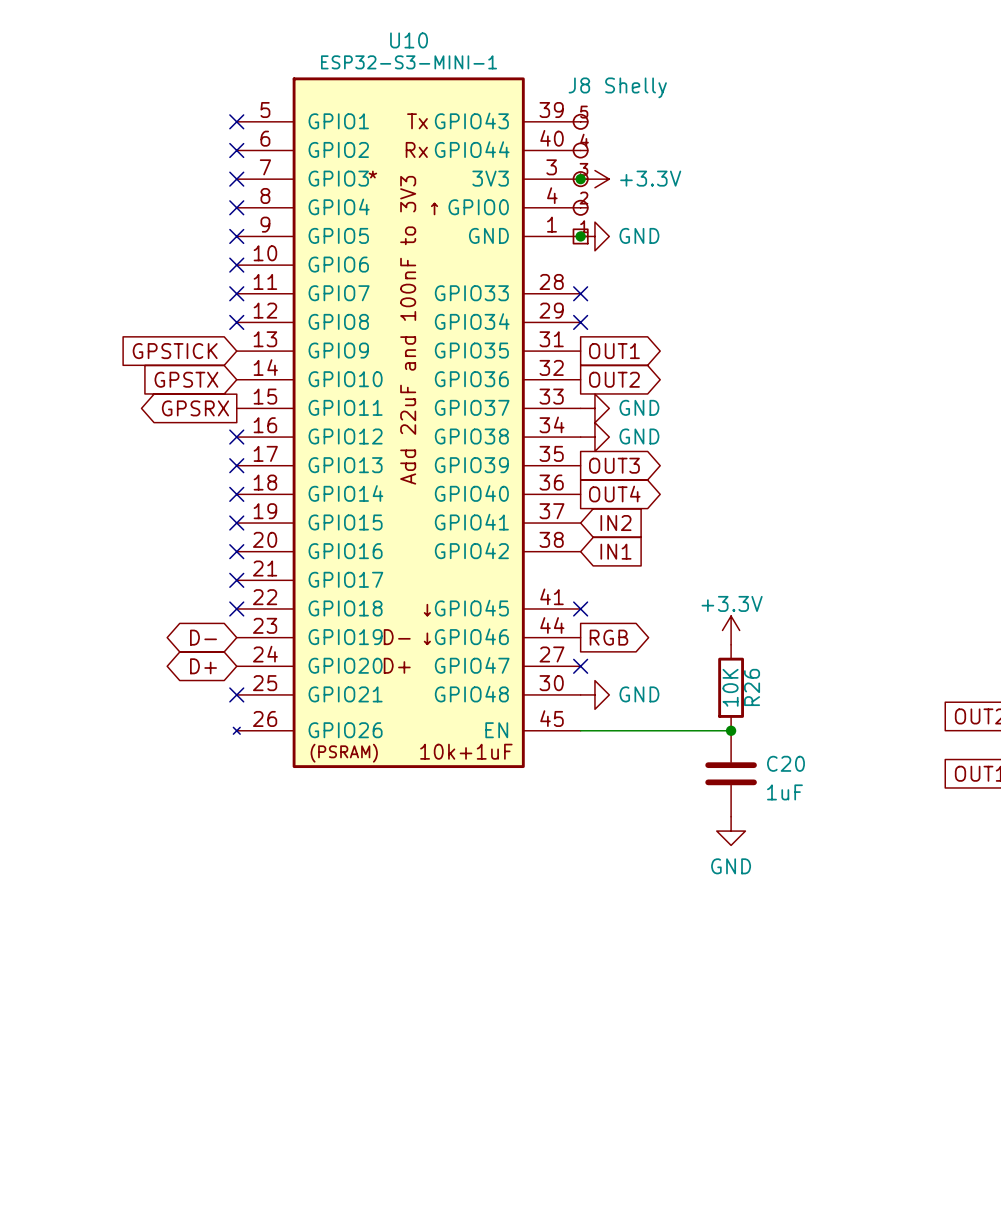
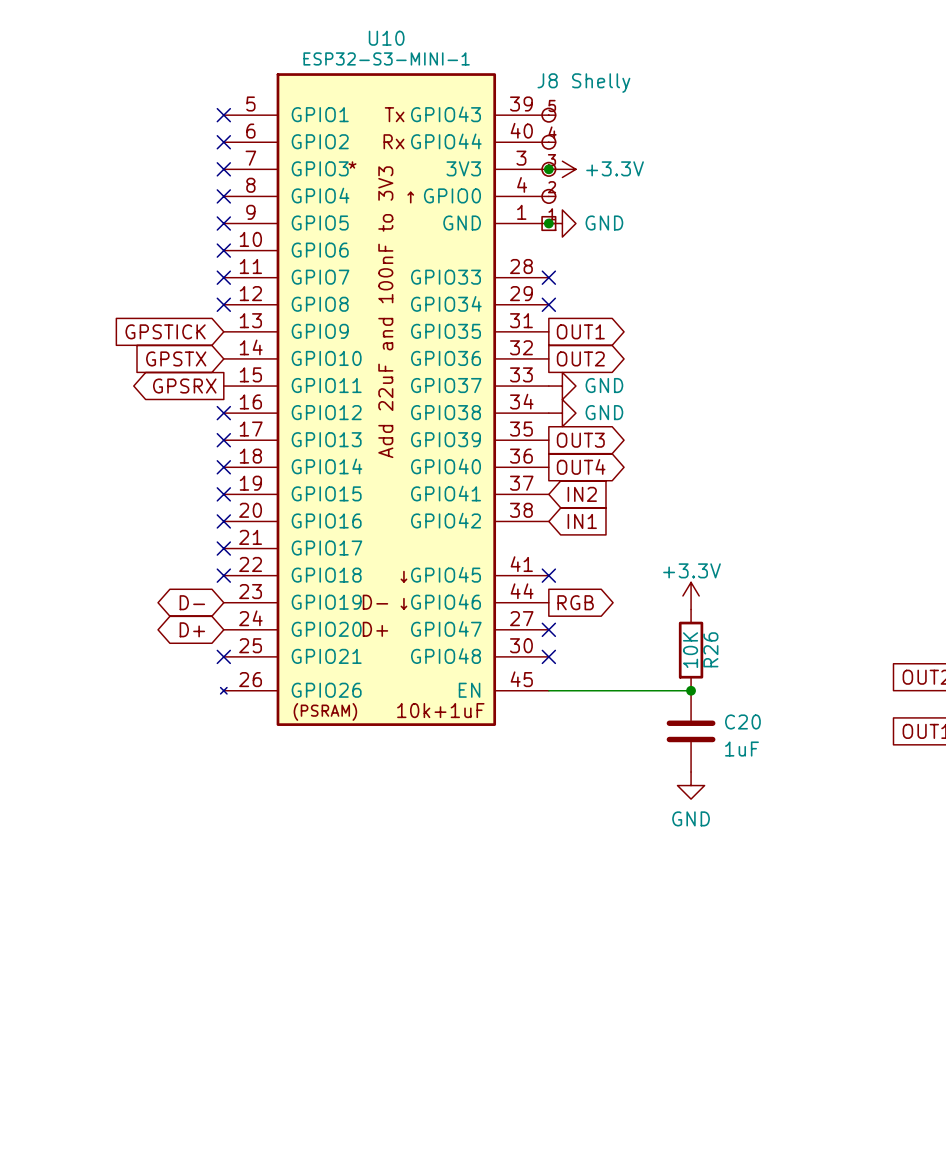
no-connect mark: none -> (548, 656)
power symbol: GND (594, 694) -> none

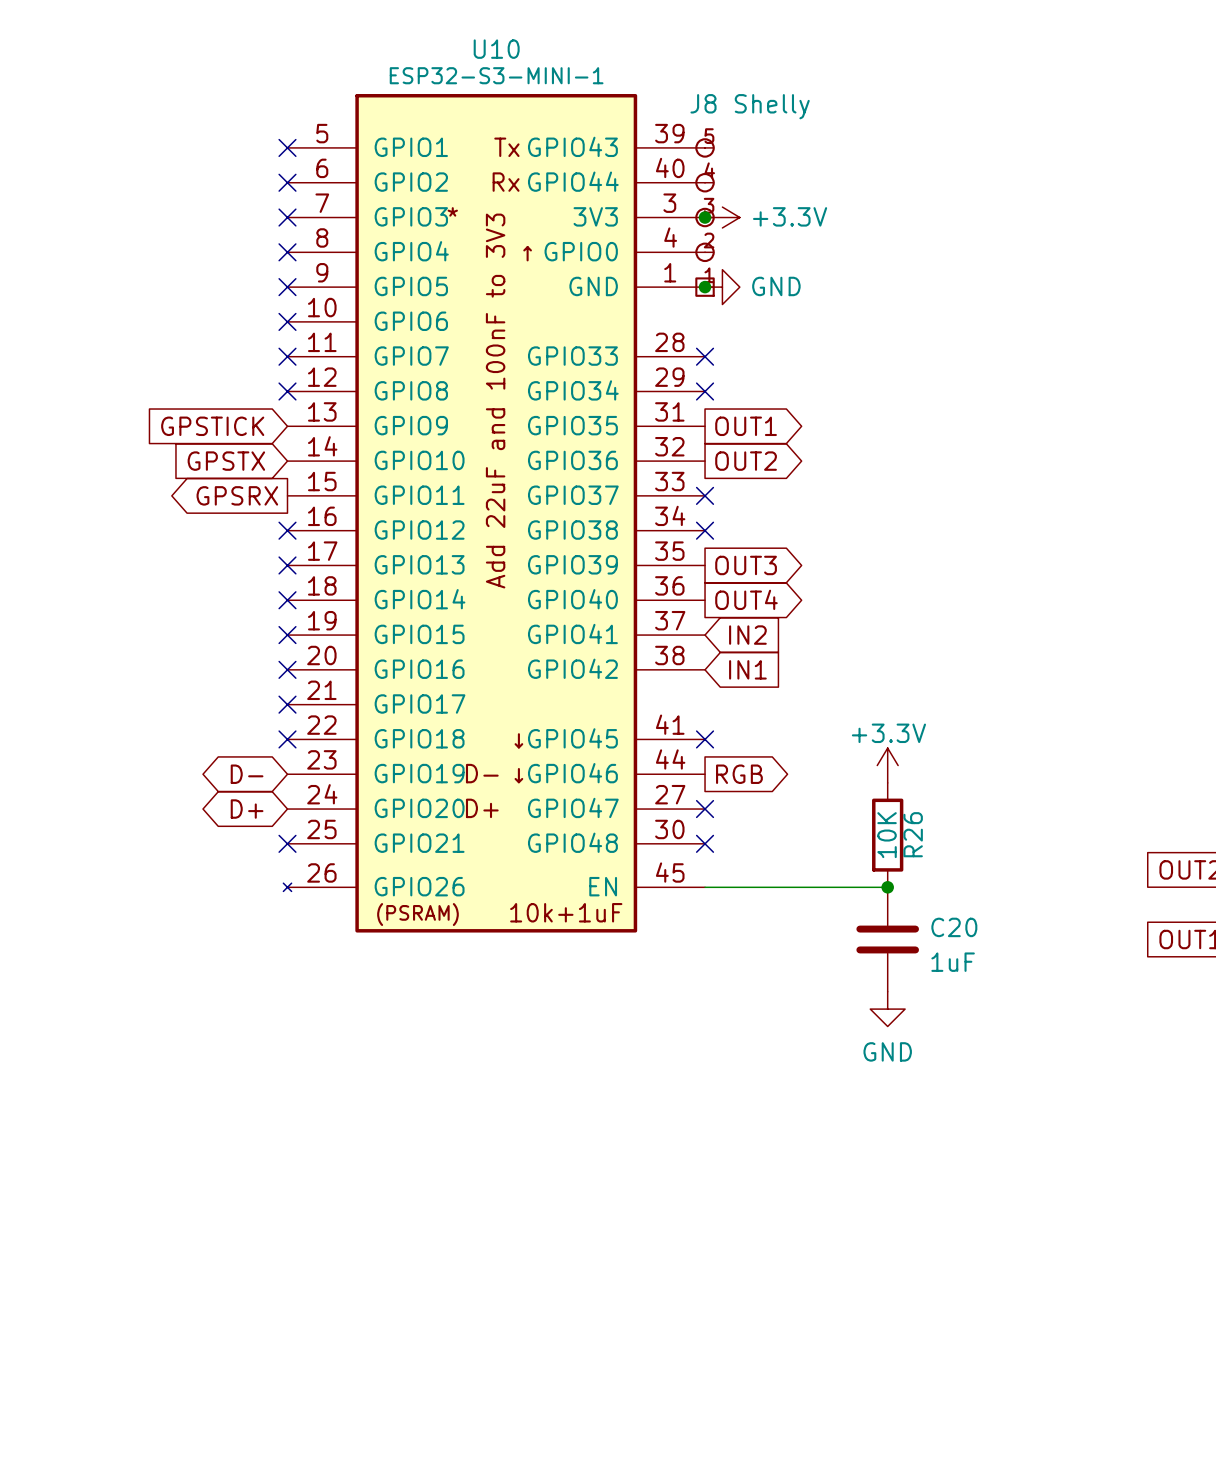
no-connect mark: none -> (705, 495)
power symbol: GND (562, 386) -> none
no-connect mark: none -> (705, 530)
power symbol: GND (562, 413) -> none

